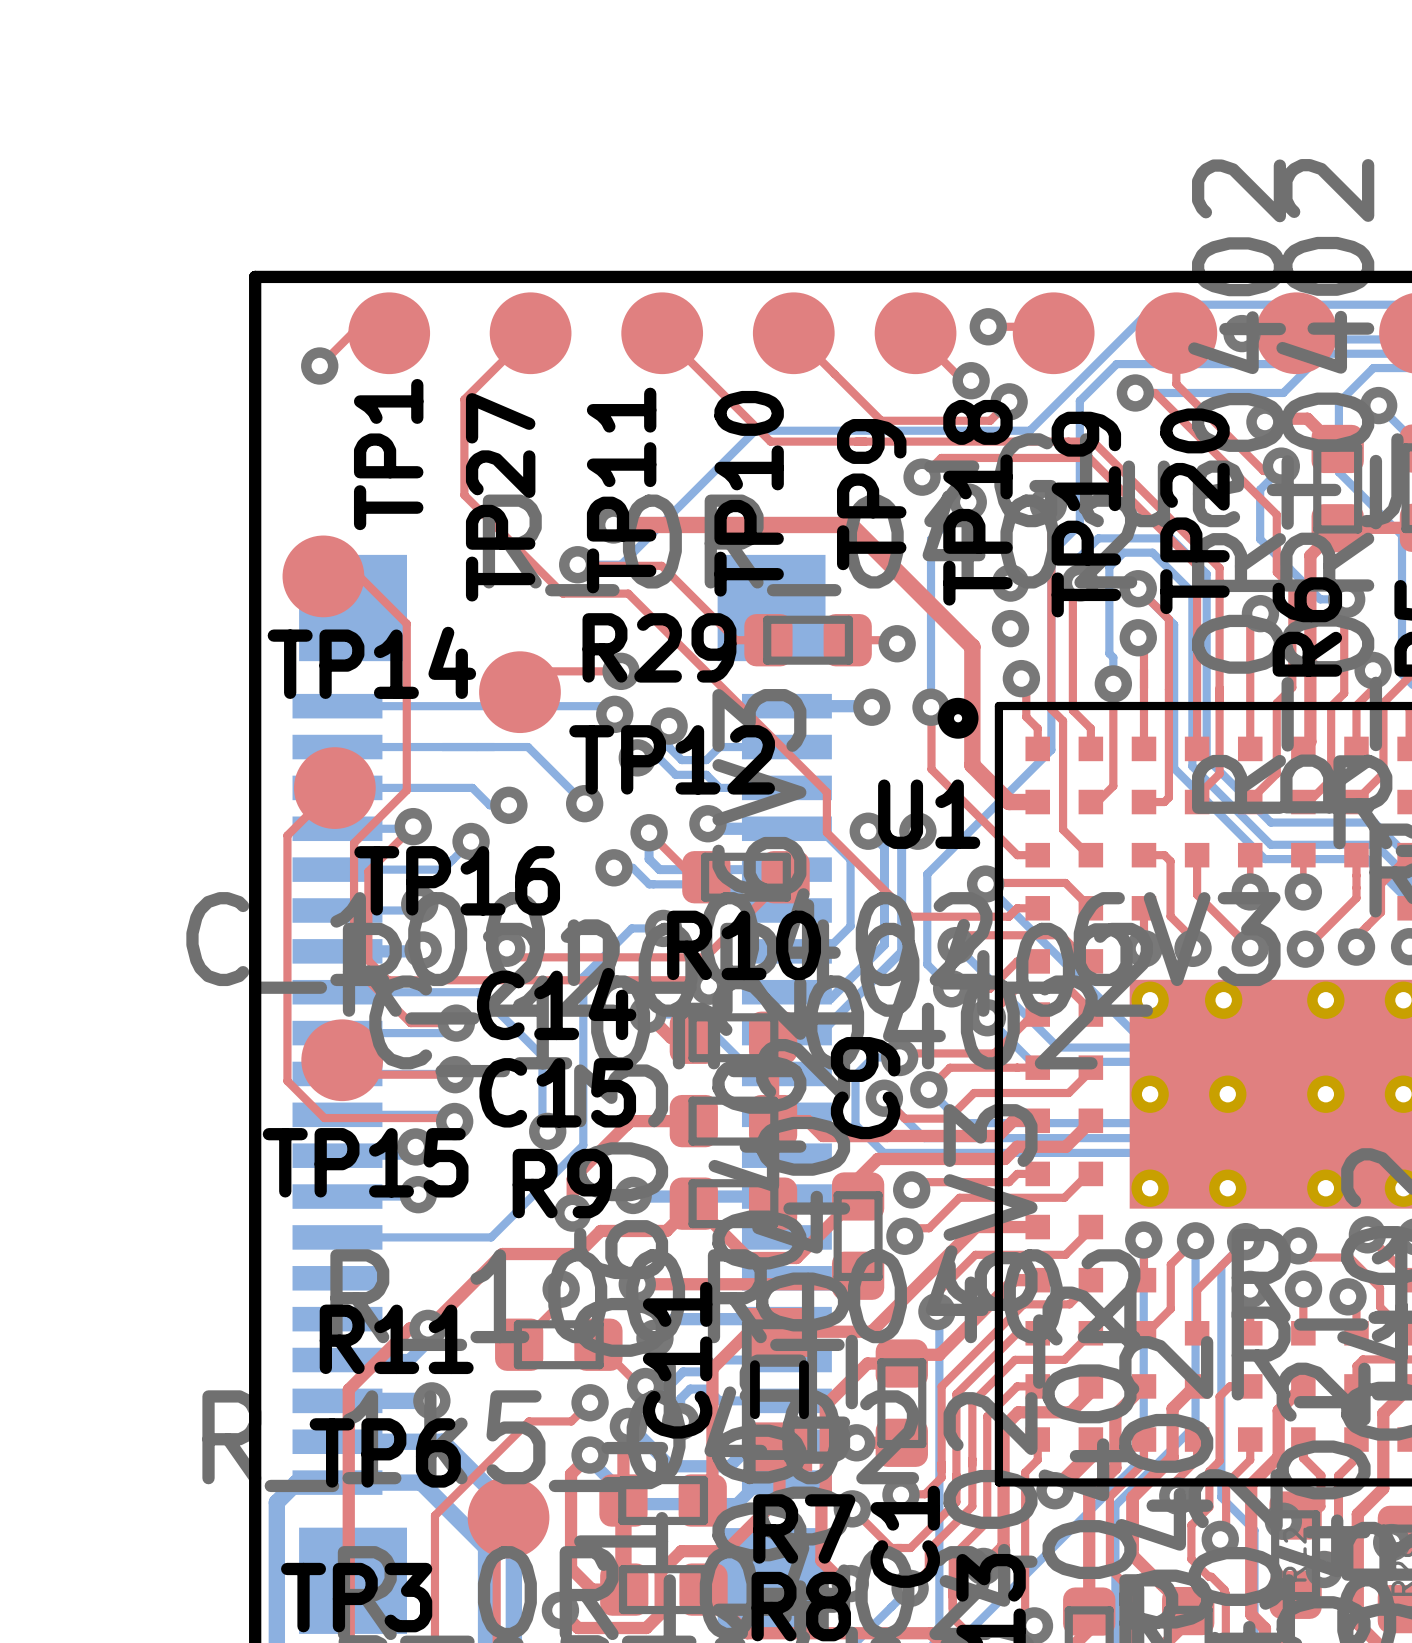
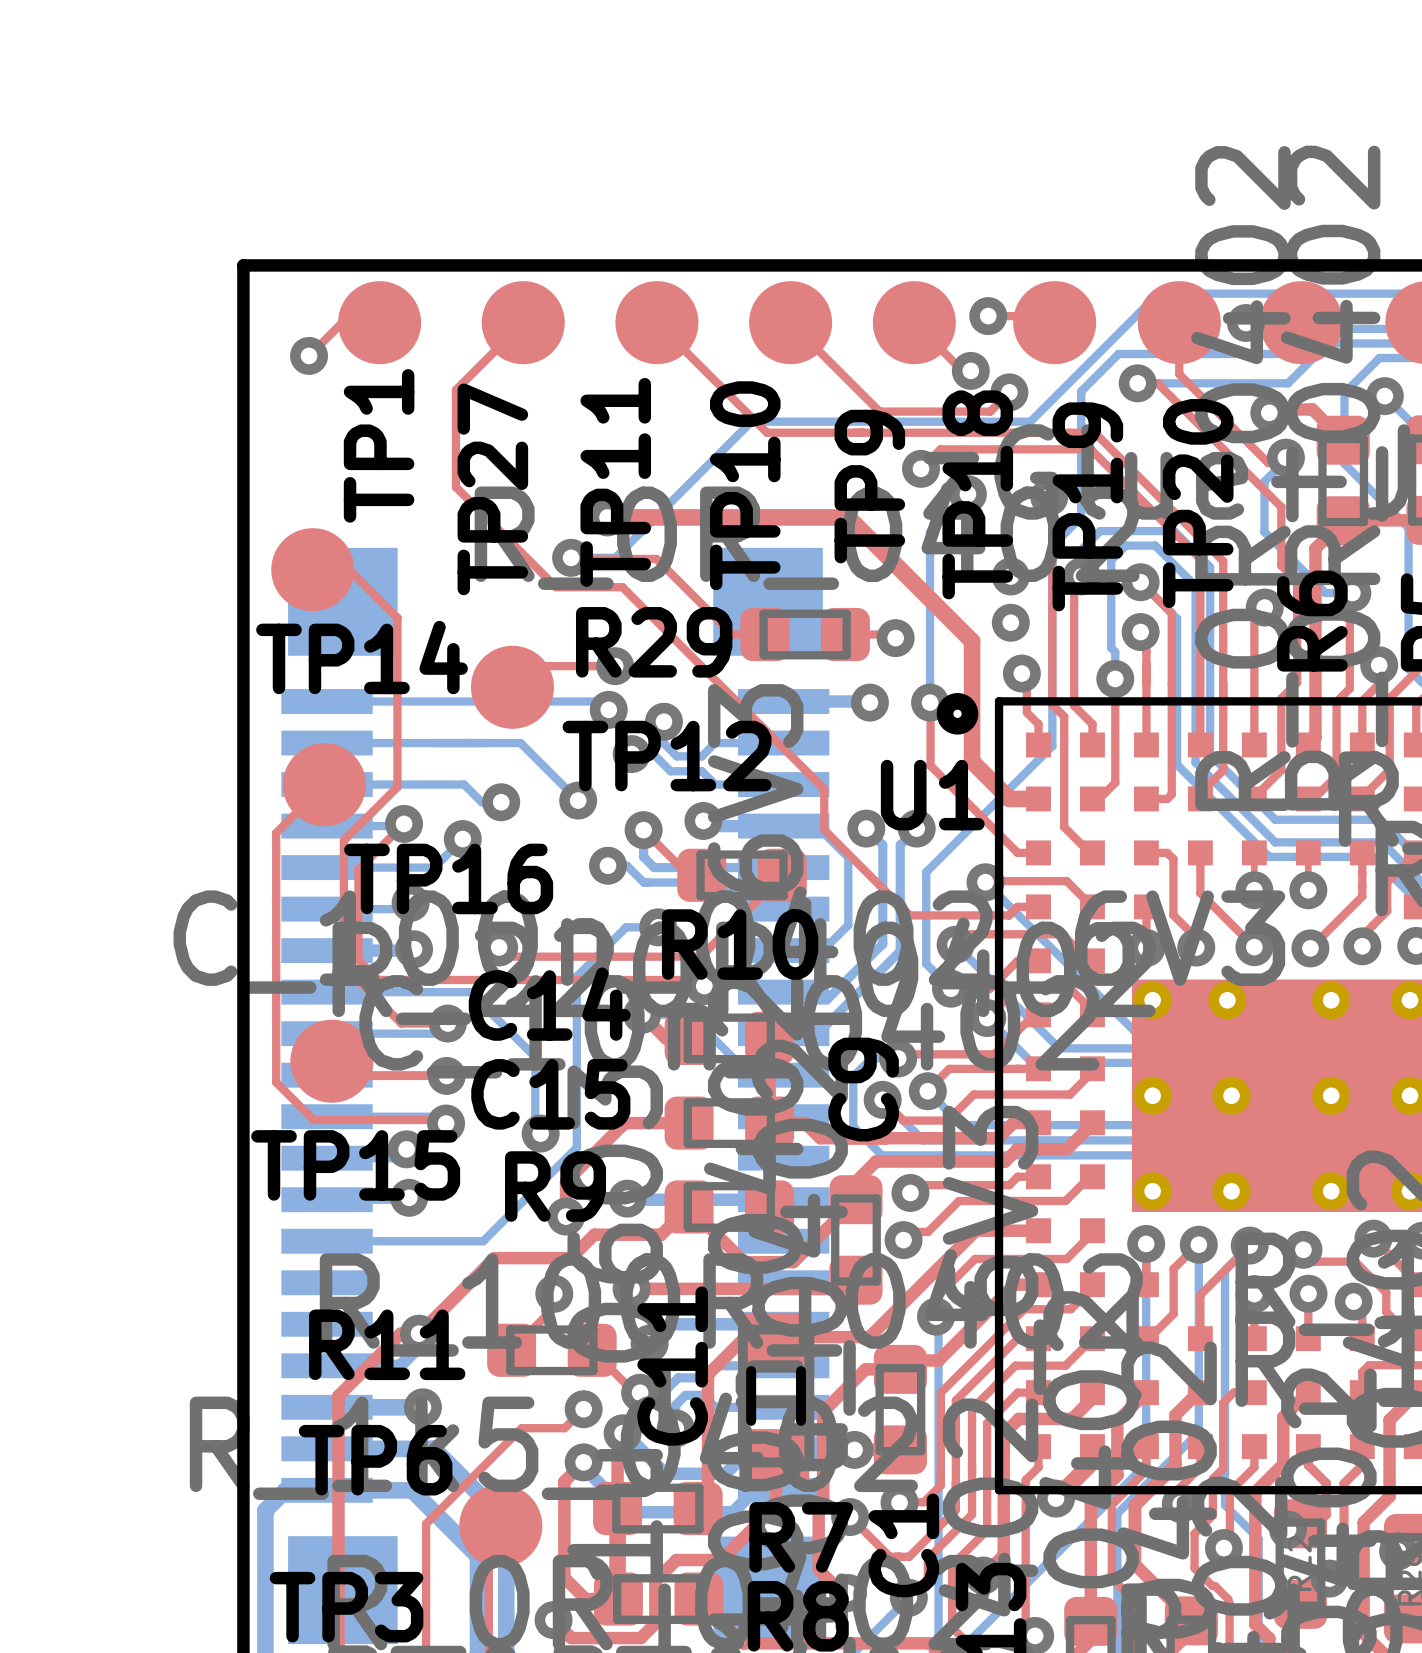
U1 name position: U1 (929, 814) -> U1 (932, 795)

